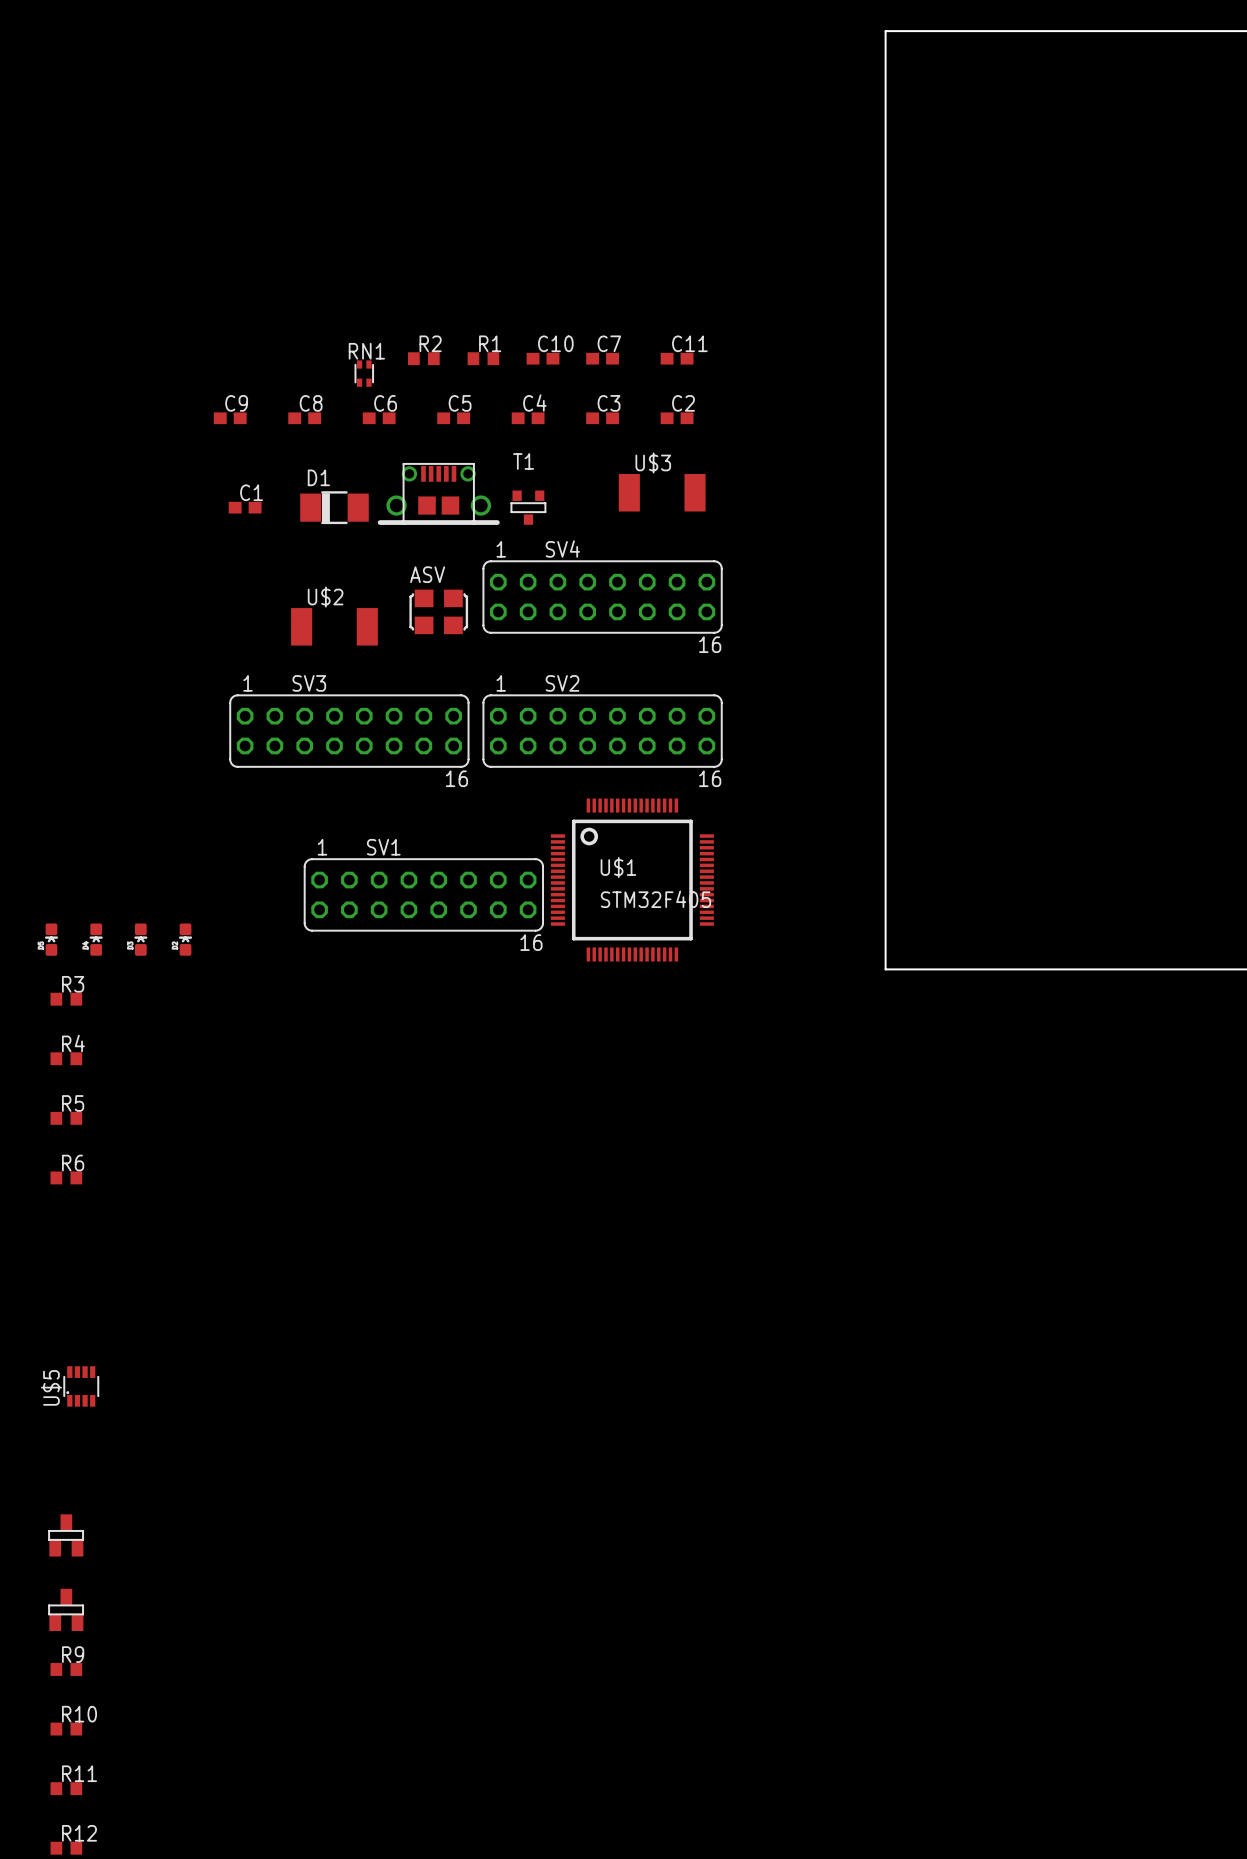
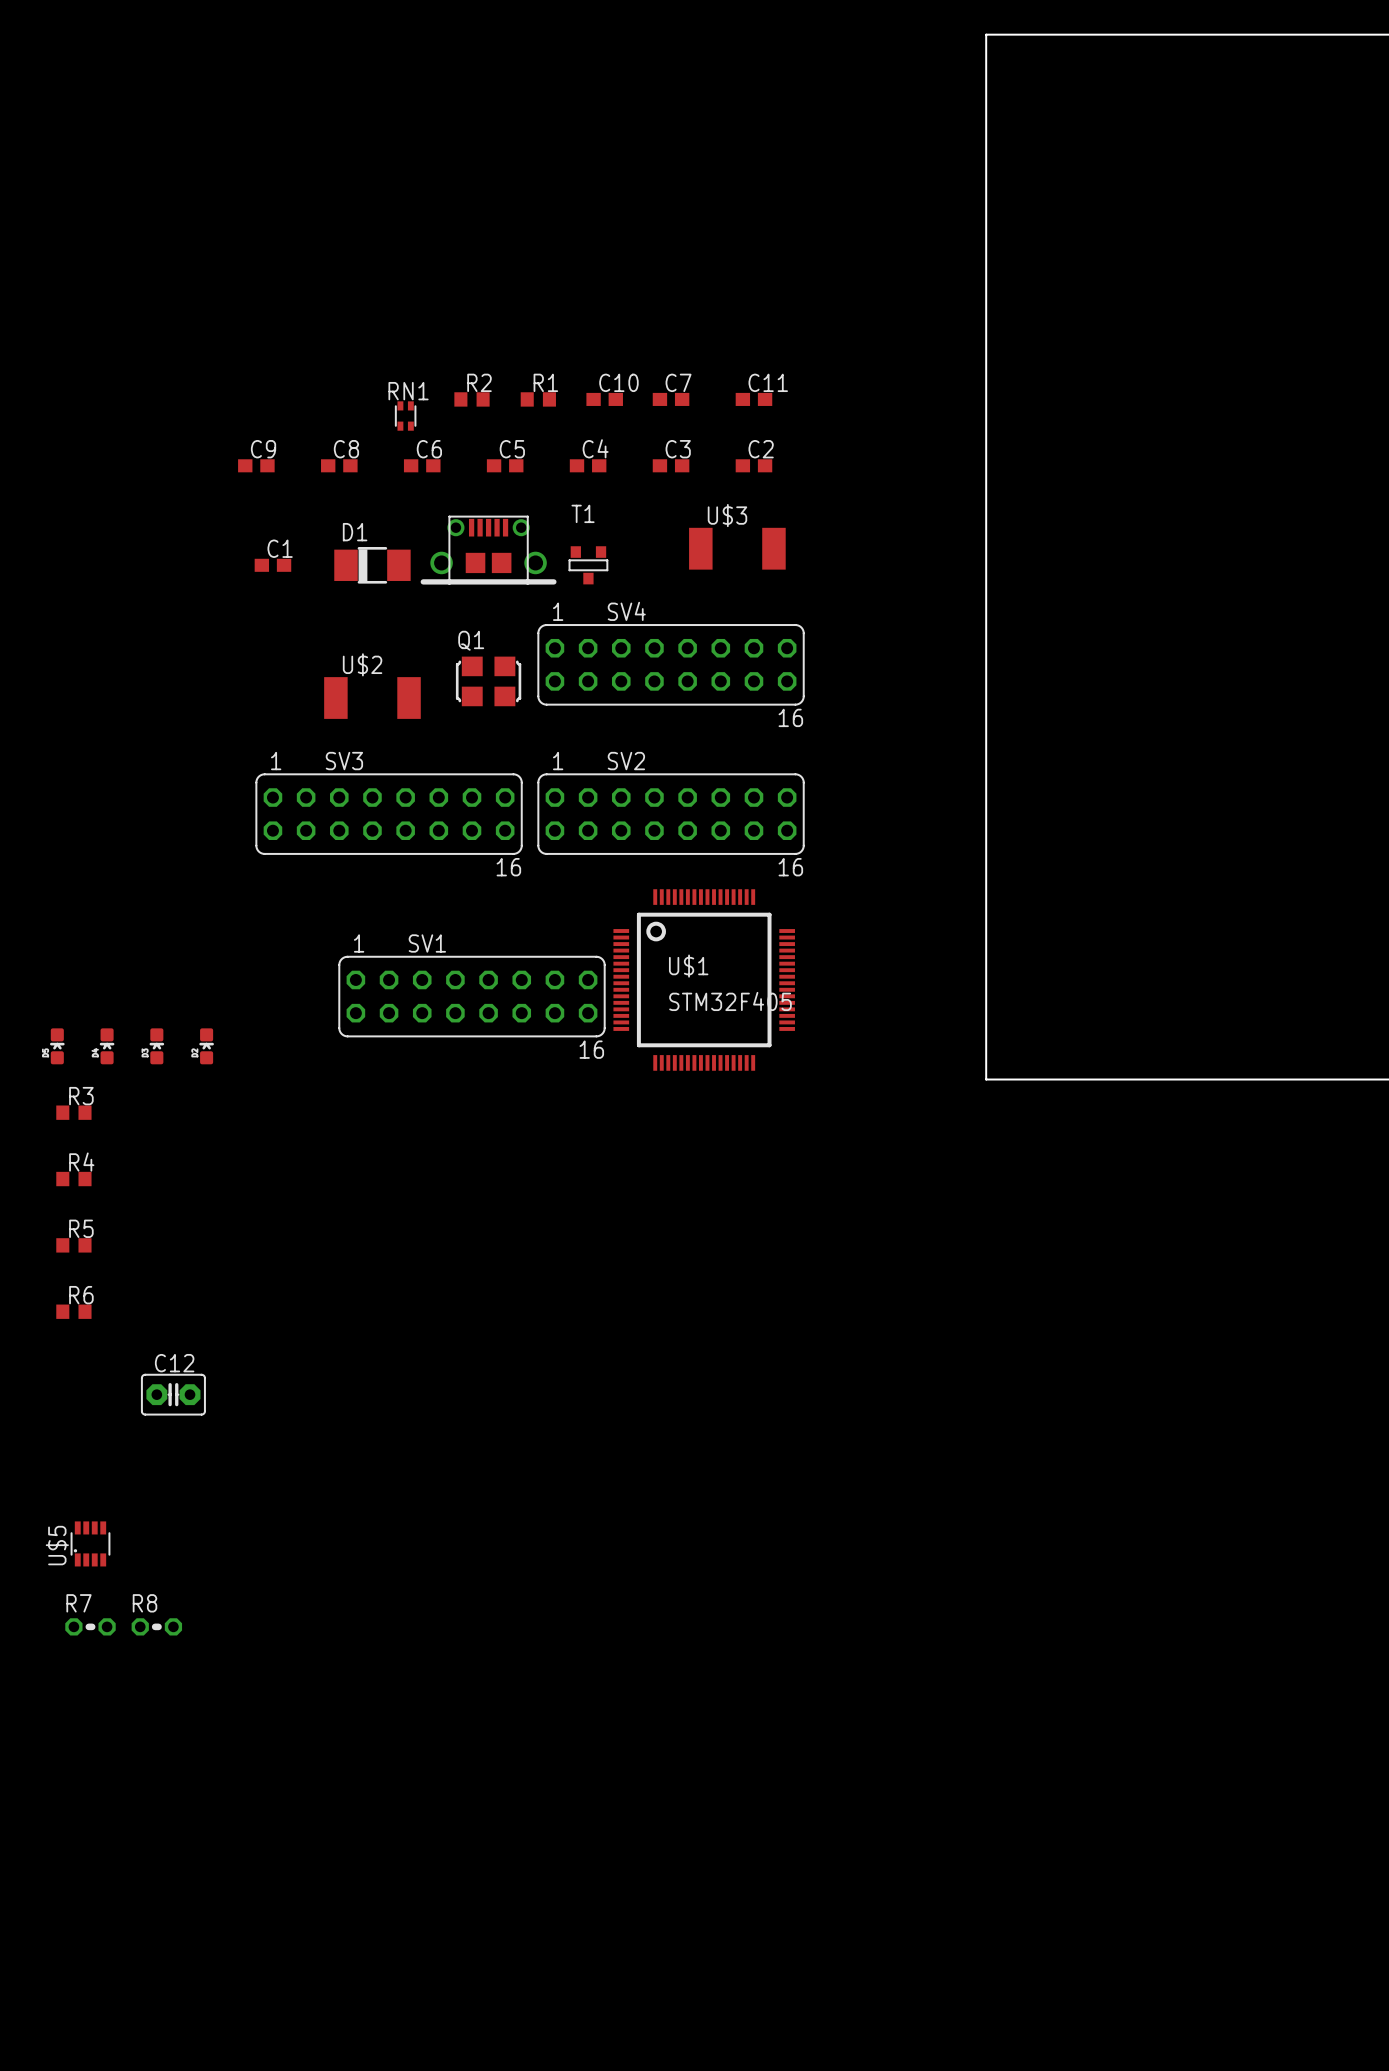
ASV name: ASV (427, 574) -> Q1 (471, 640)
C12: none -> (173, 1394)
R7: none -> (90, 1626)
R8: none -> (156, 1626)
part: (66, 1535) -> none
part: (66, 1609) -> none
R9: (66, 1669) -> none
R10: (66, 1729) -> none
R11: (66, 1788) -> none
R12: (66, 1848) -> none

